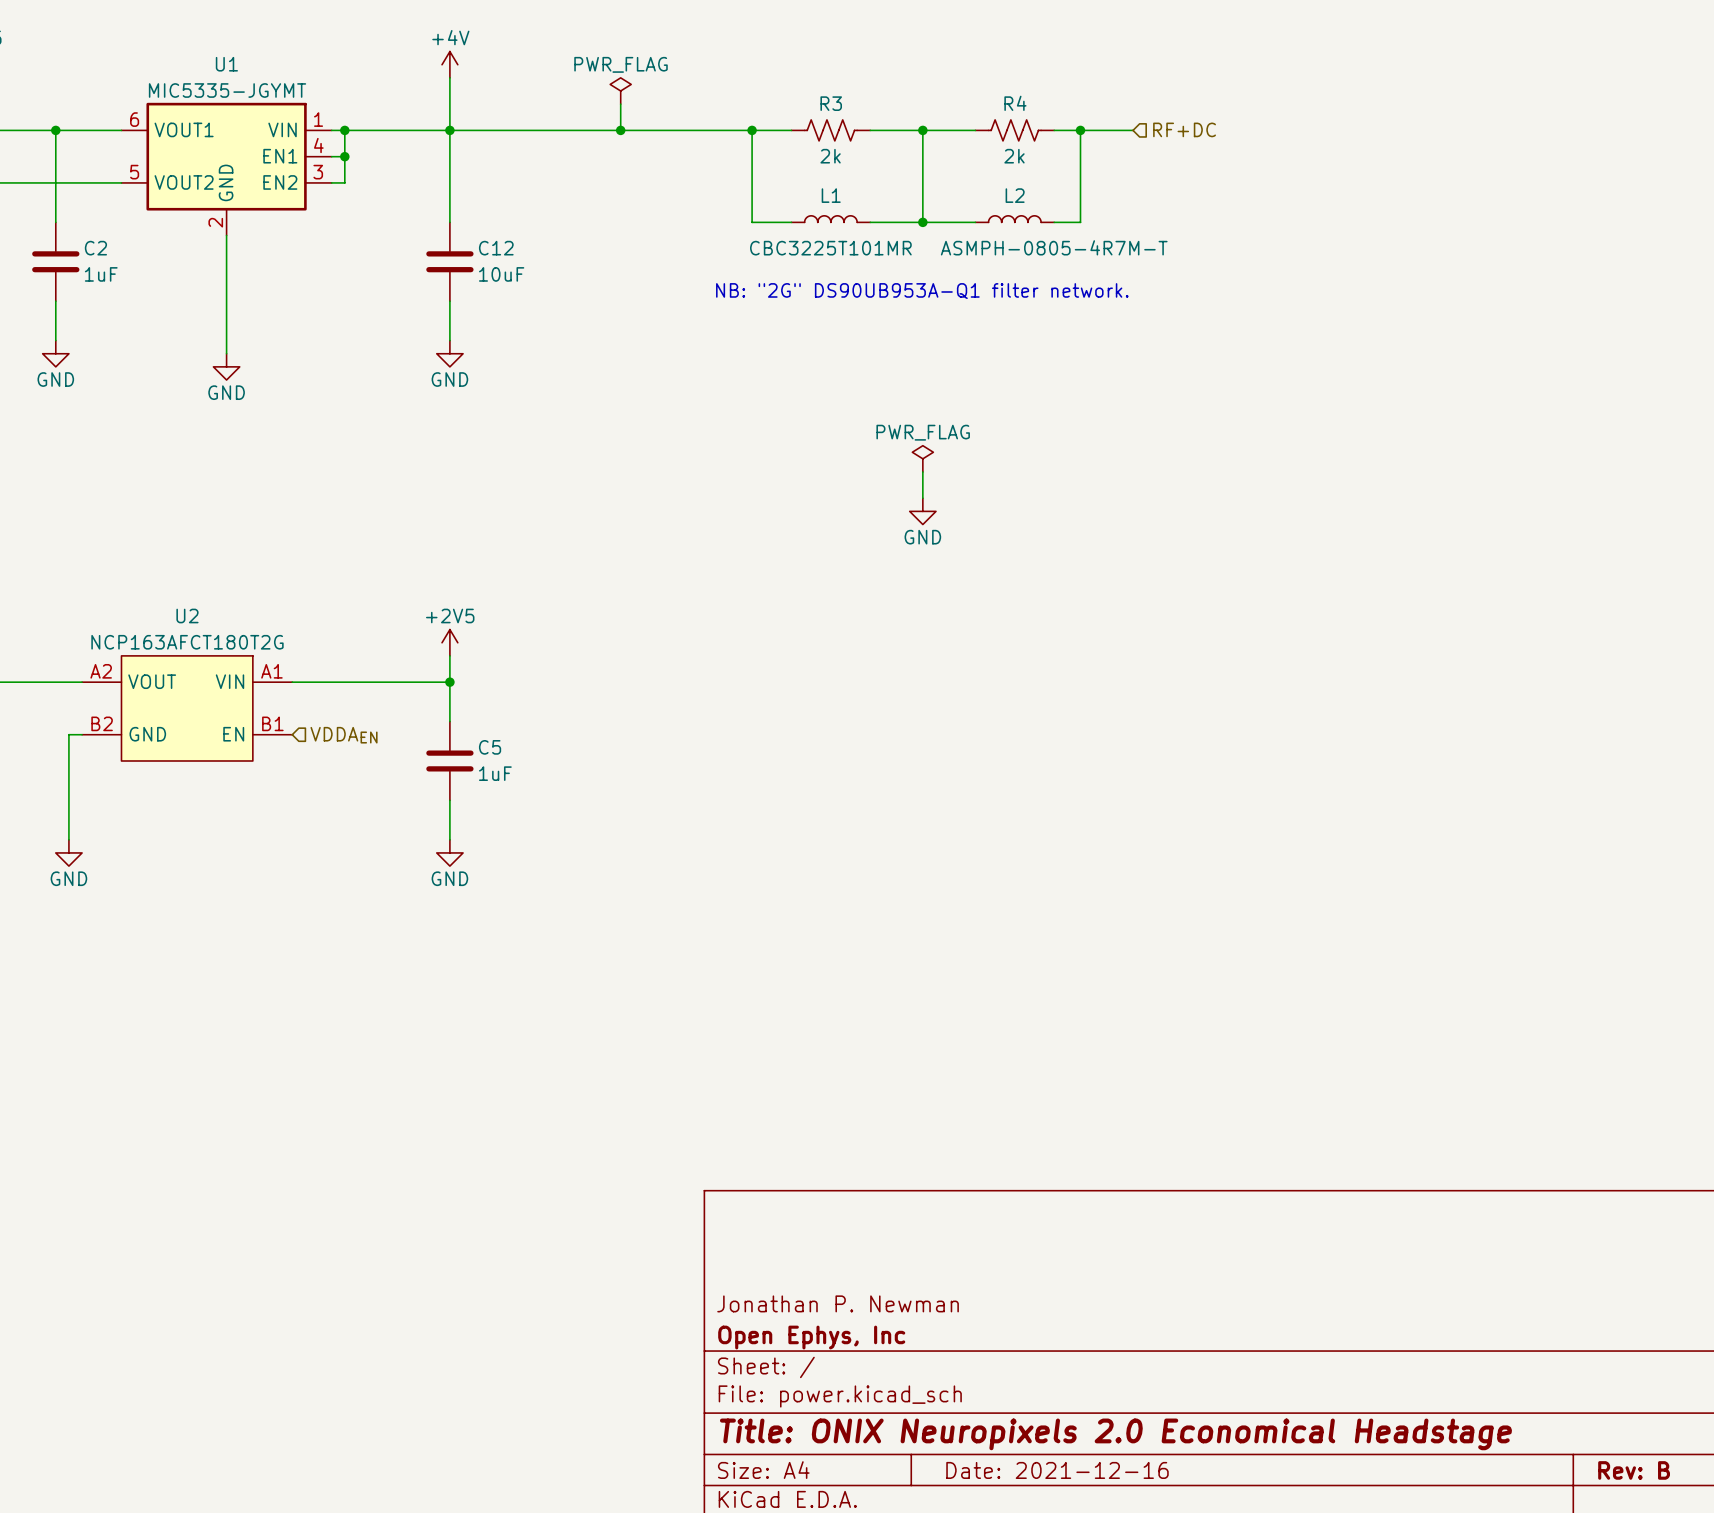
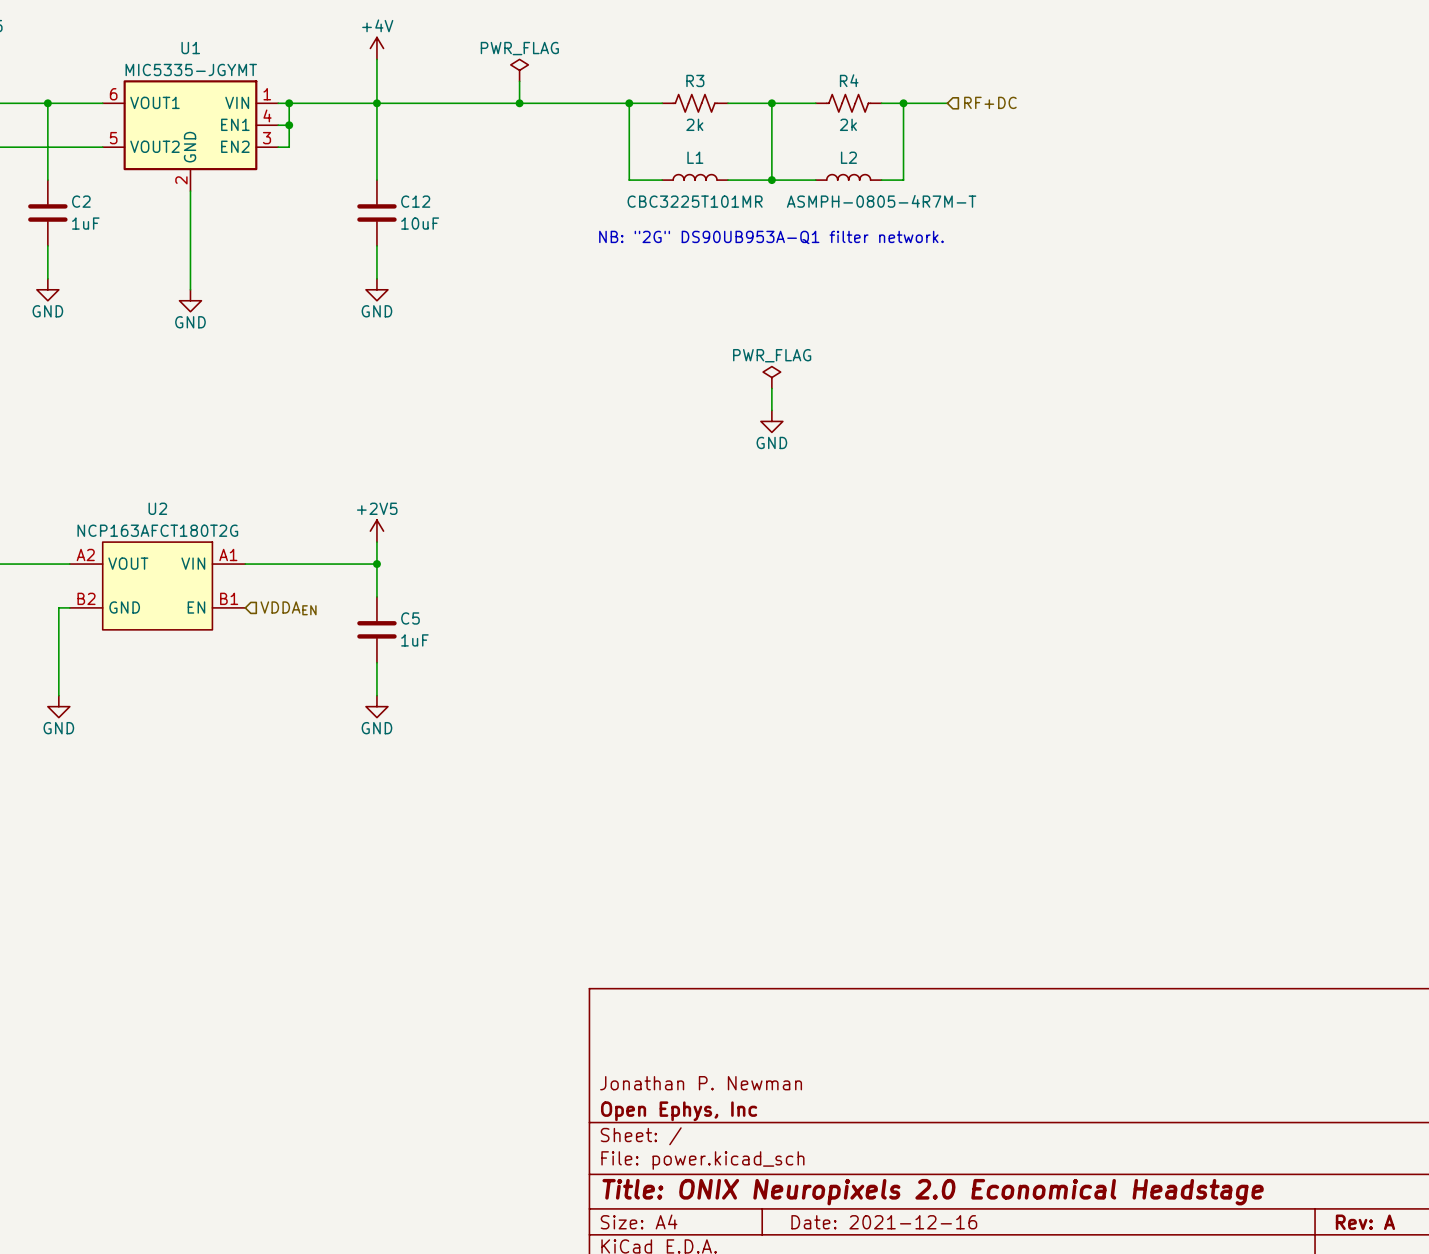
title block: Rev: B (1634, 1470) -> Rev: A (1365, 1222)

